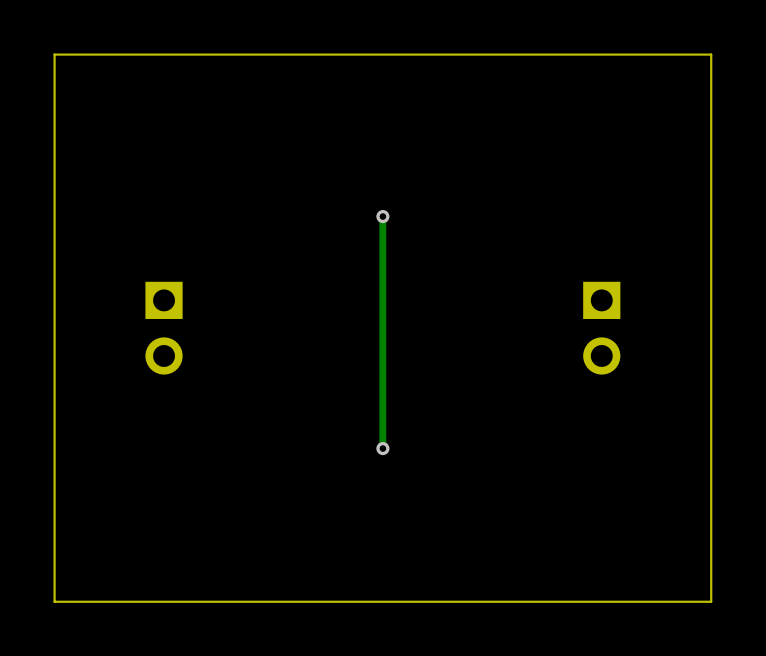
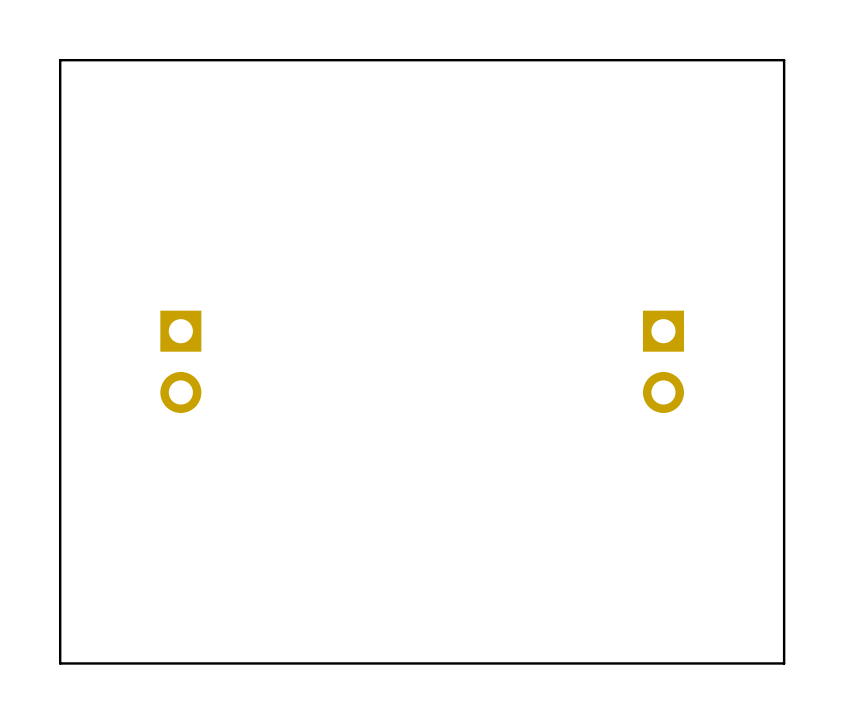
track: (382, 216) (382, 448) -> none
via: (382, 216) -> none
via: (382, 448) -> none

